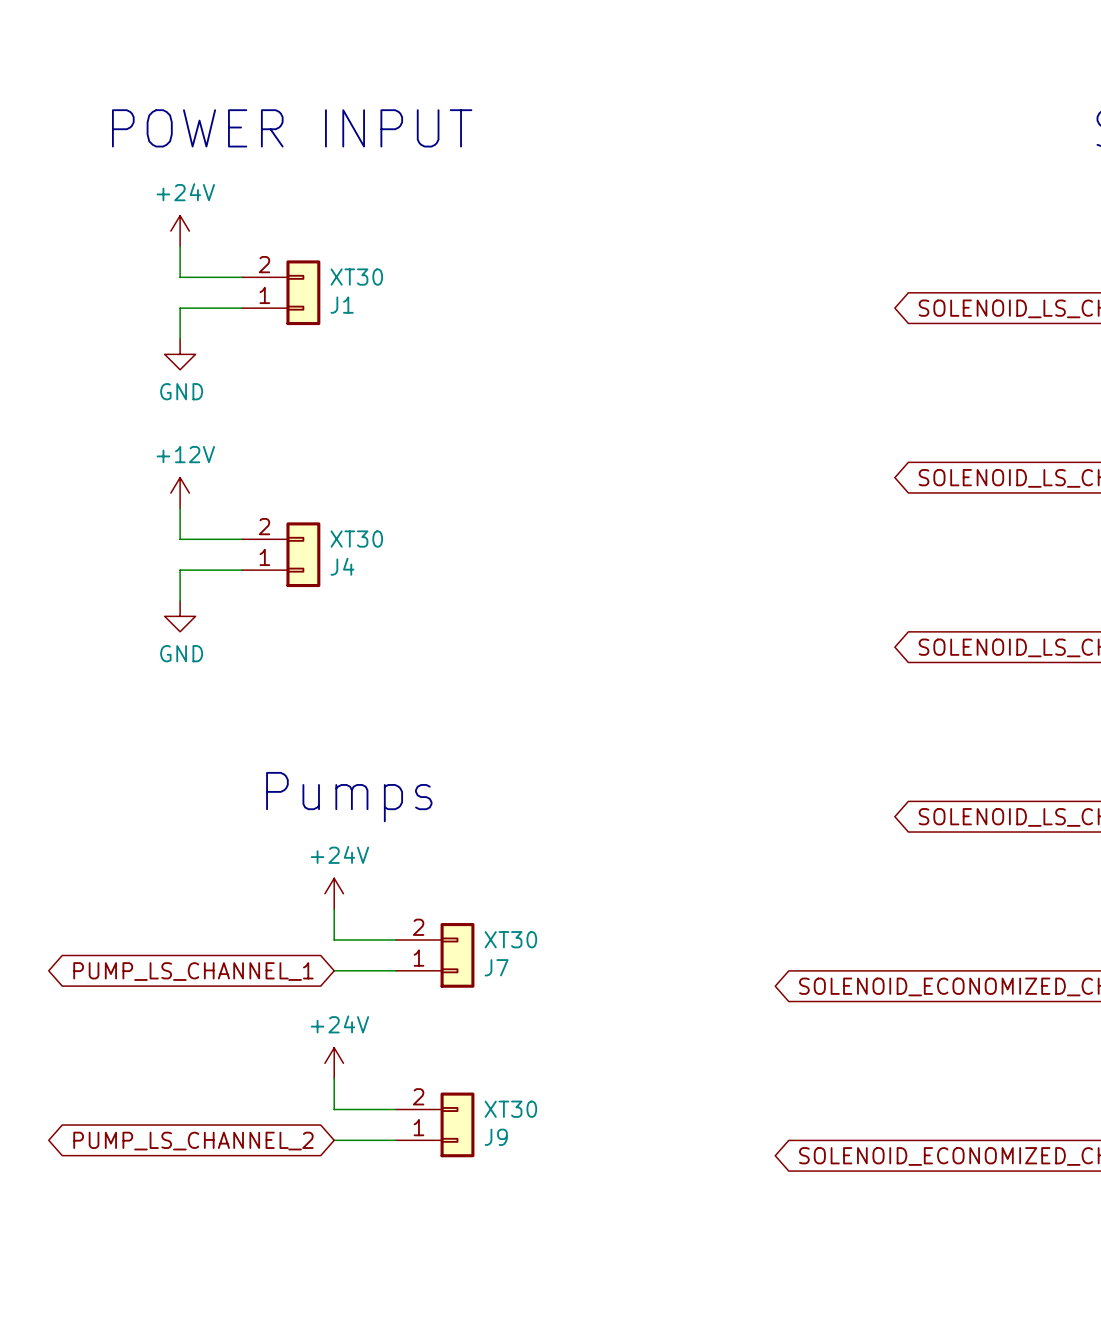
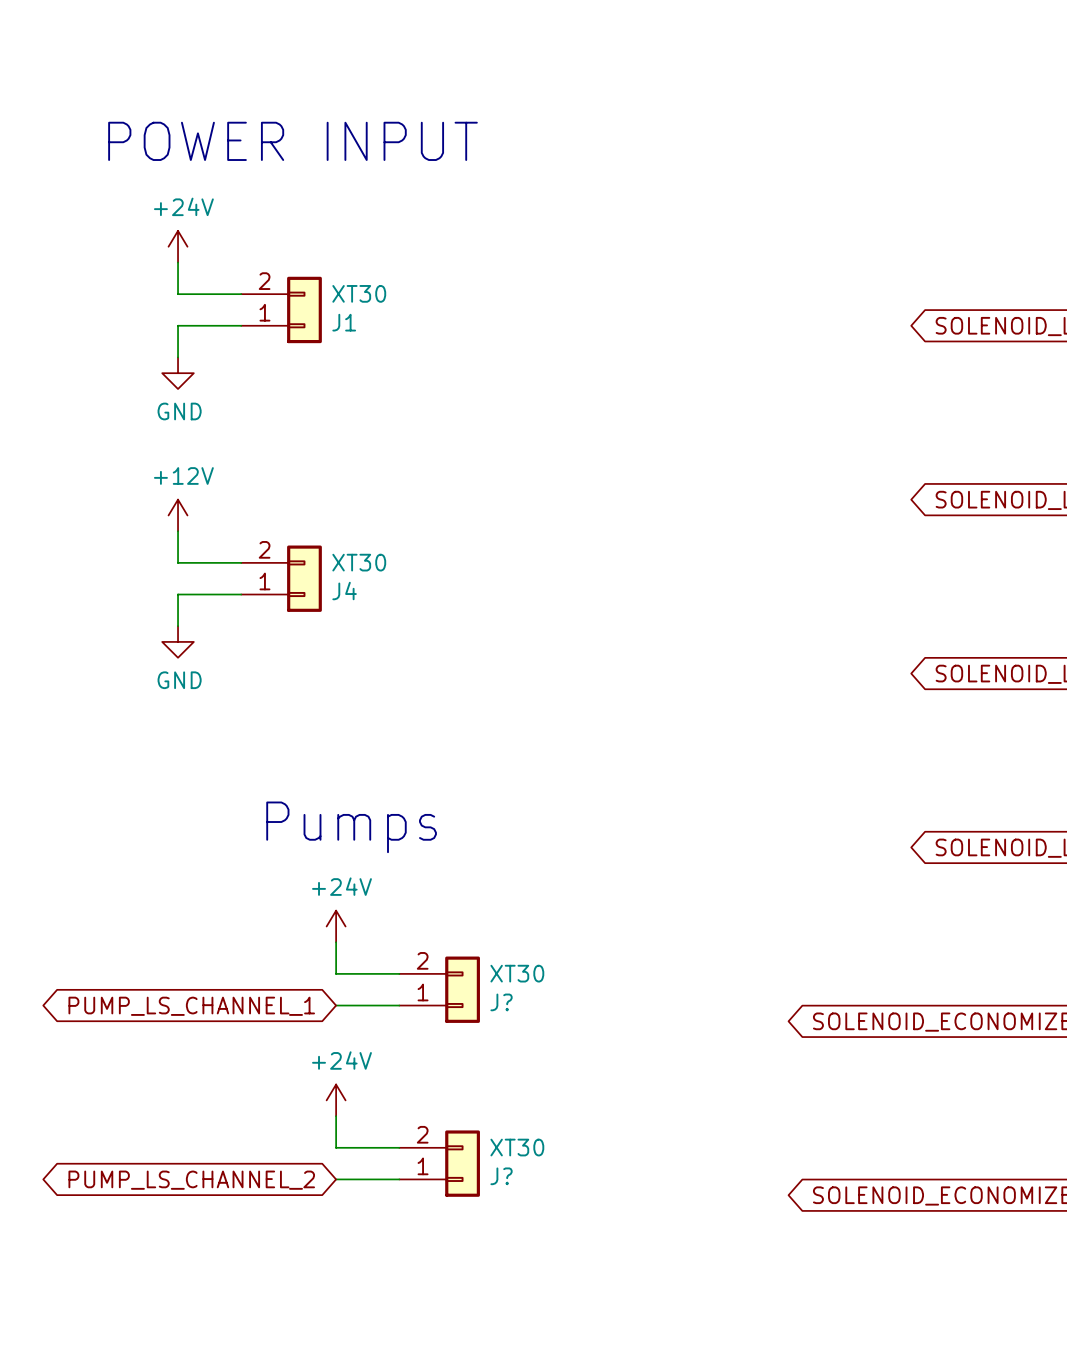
J7 name: J7 (496, 967) -> J? (501, 1002)
J9 name: J9 (496, 1137) -> J? (501, 1176)

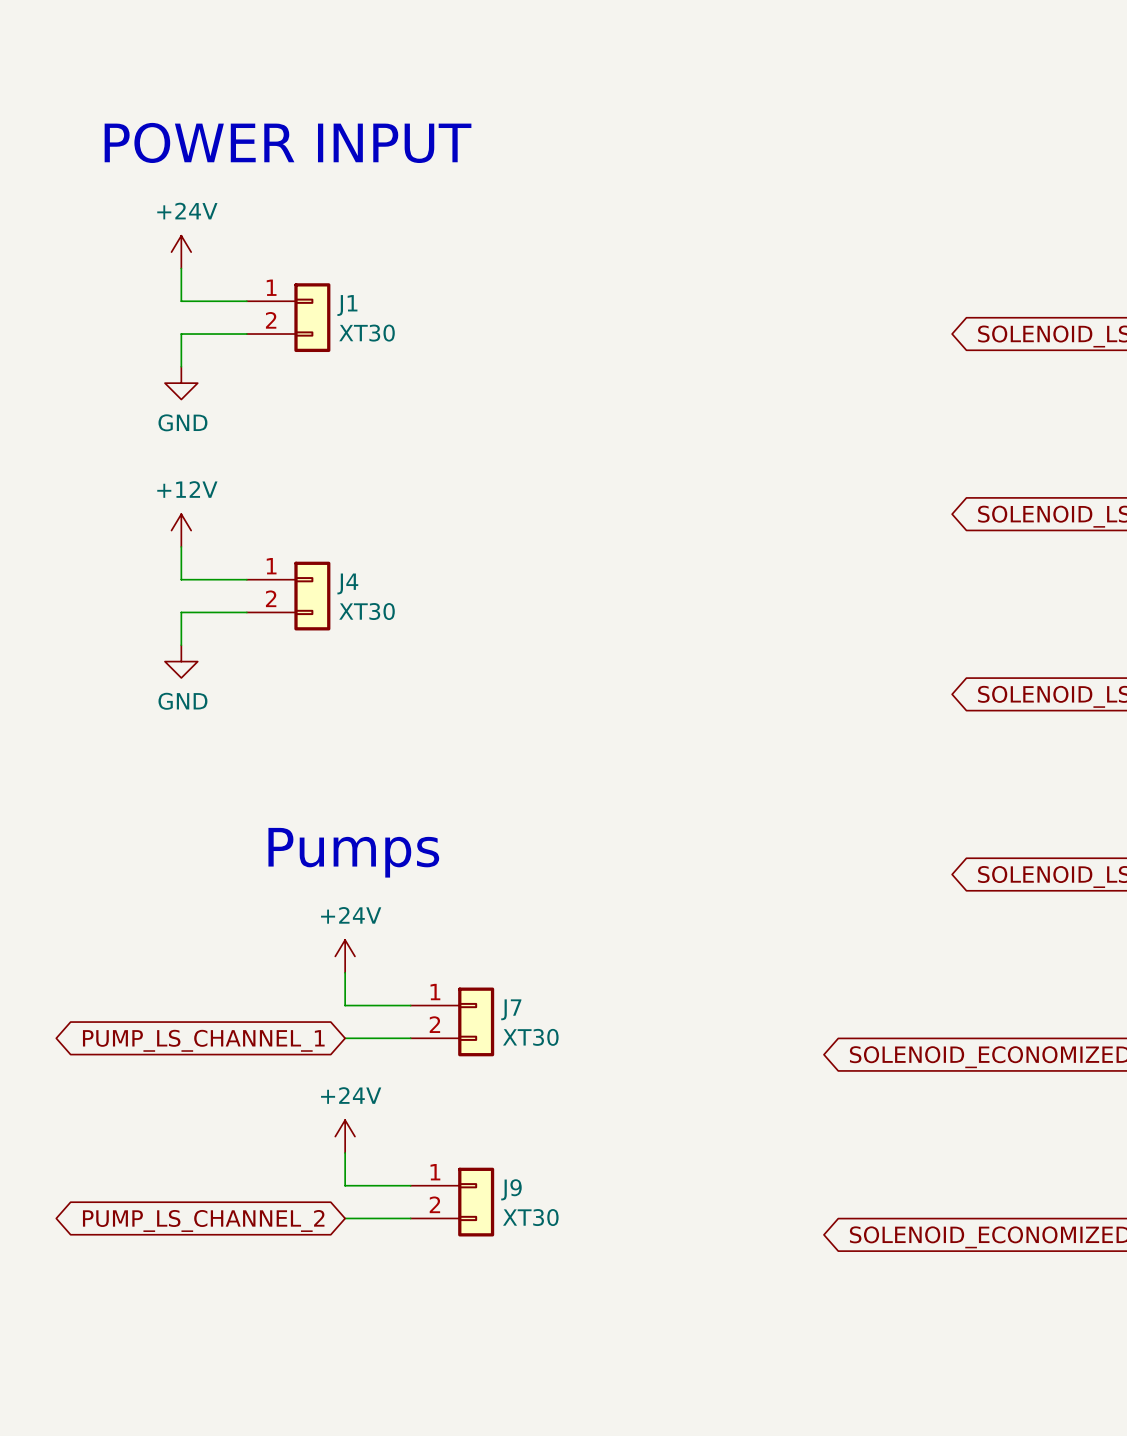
J1 flip: as is (304, 309) -> up-down (312, 317)
J4 flip: as is (304, 578) -> up-down (312, 596)
J? flip: as is (462, 989) -> up-down (476, 1021)
J? name: J? (501, 1002) -> J7 (511, 1009)
J? flip: as is (462, 1163) -> up-down (476, 1202)
J? name: J? (501, 1176) -> J9 (511, 1189)

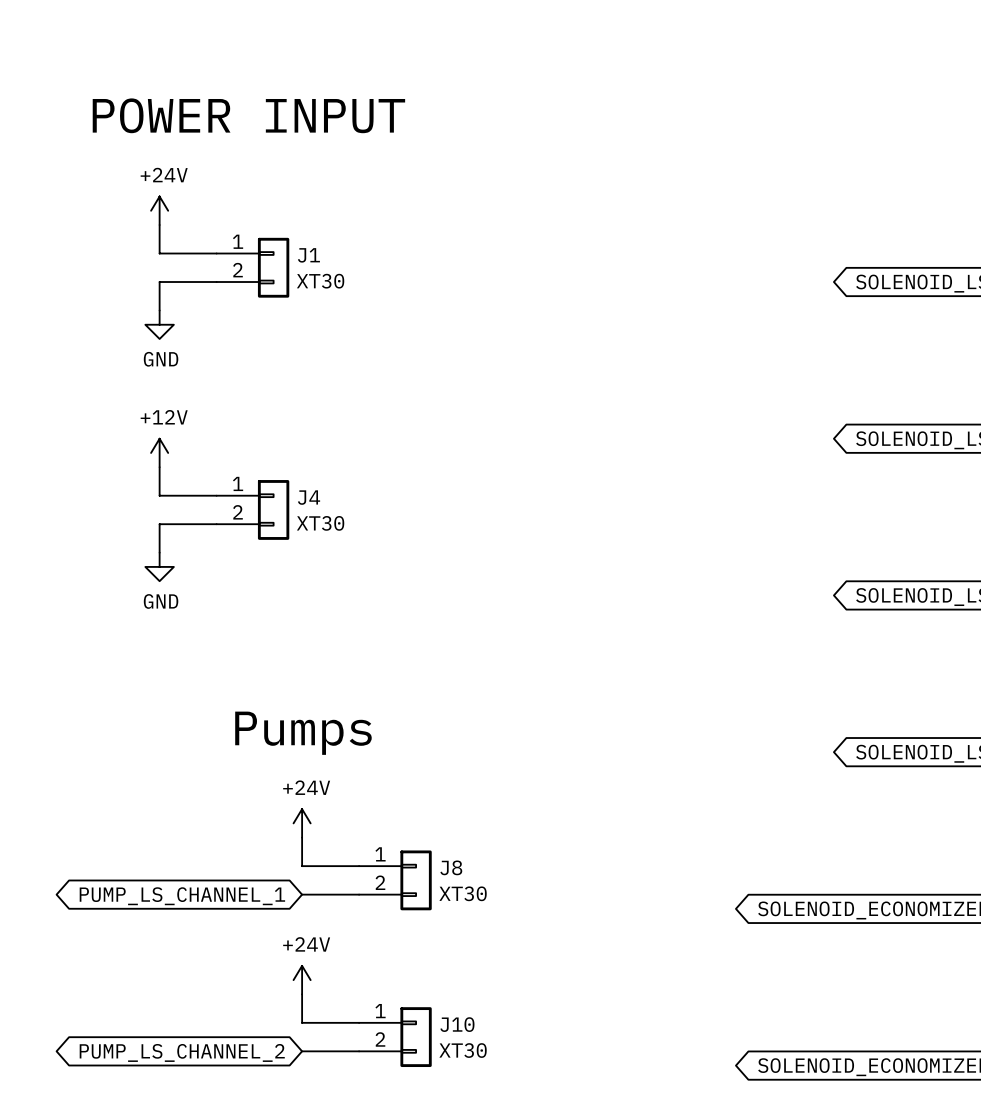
J7 name: J7 (511, 1009) -> J8 (451, 867)
J9 name: J9 (511, 1189) -> J10 (457, 1024)

